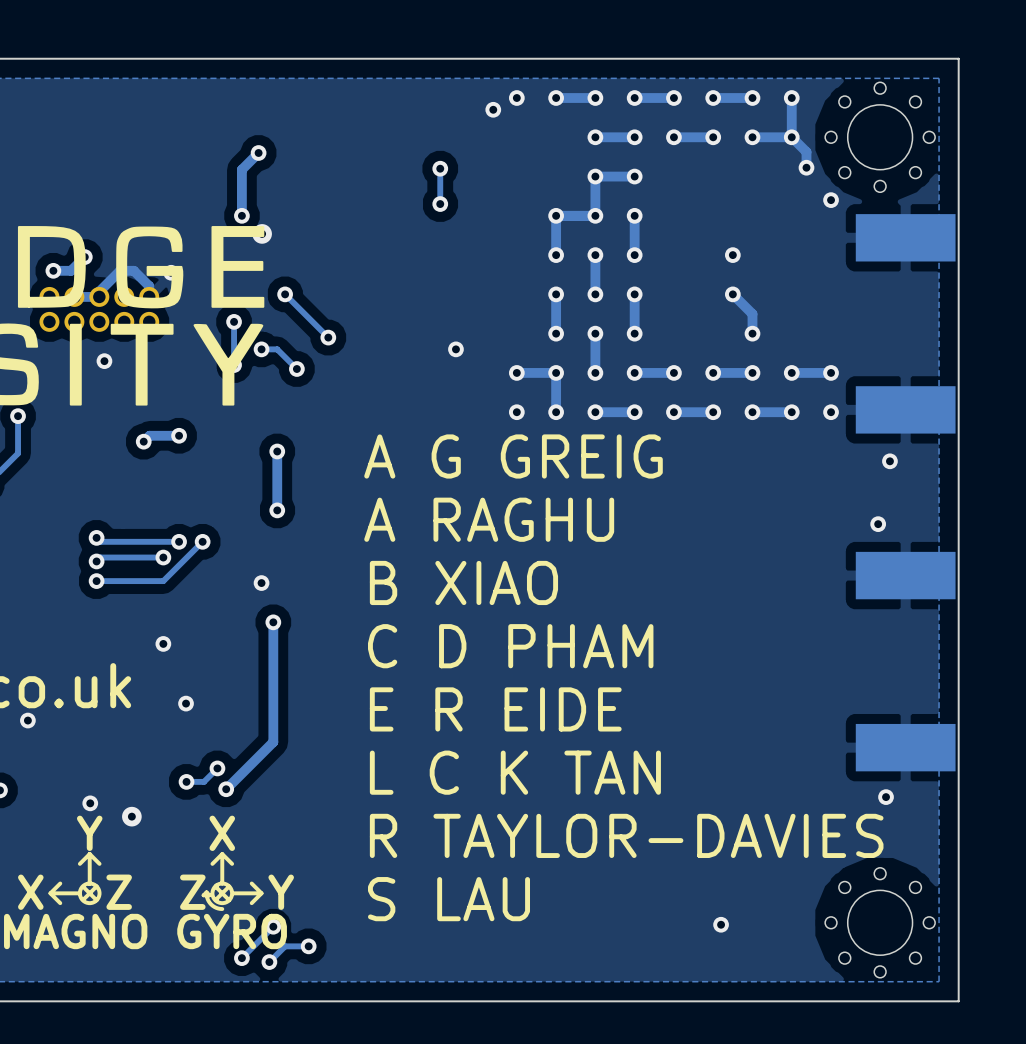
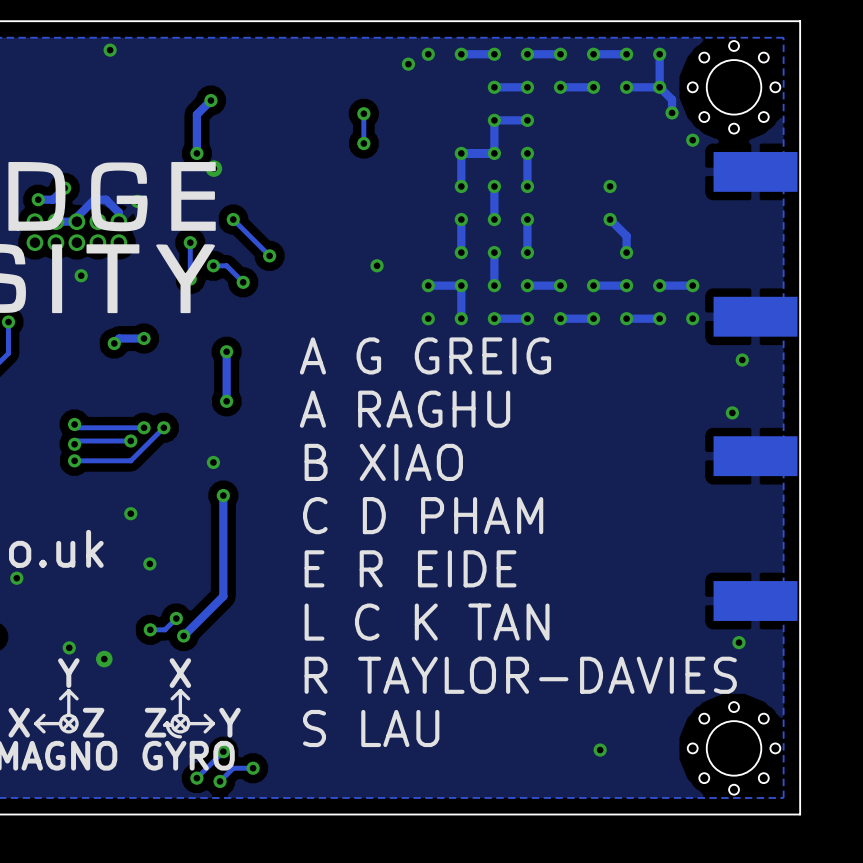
via: none -> (110, 50)

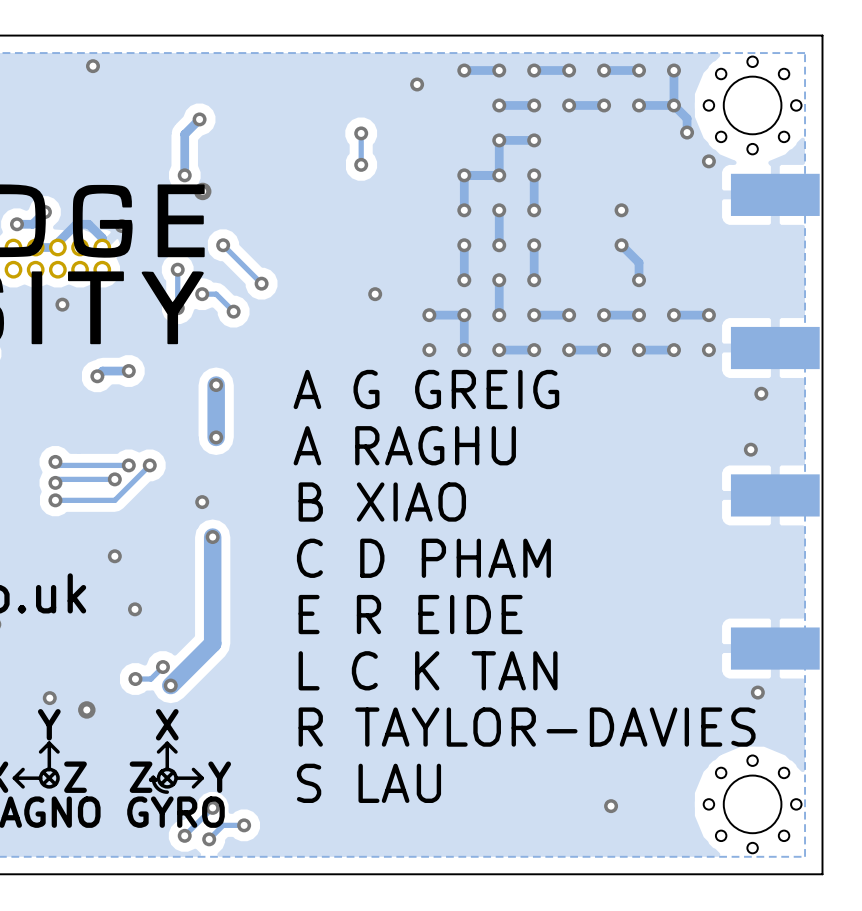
via: (428, 54) -> none
via: (408, 64) -> none
via: none -> (417, 84)
track width: thin (226, 351) (226, 401) -> thick (216, 385) (216, 437)
track width: thin (223, 495) (223, 596) (183, 636) -> thick (212, 537) (212, 643) (170, 685)

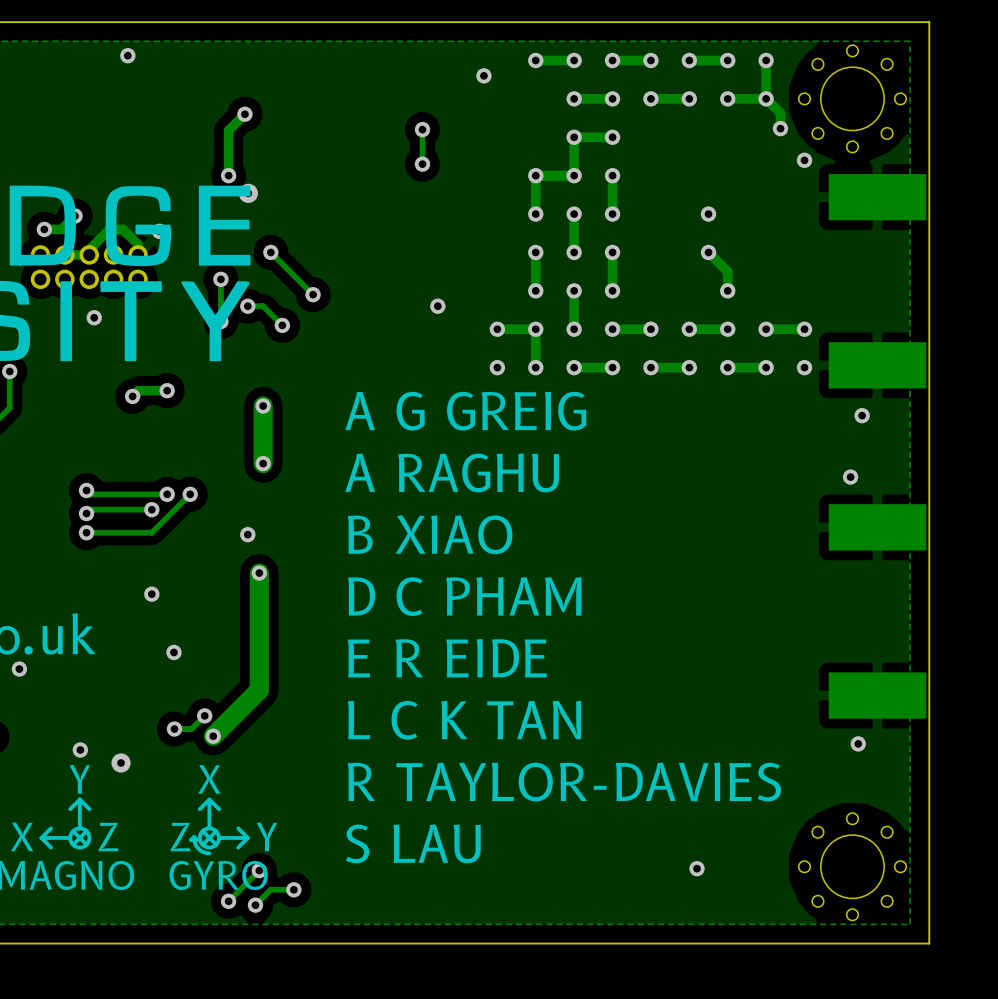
text: C D PHAM (423, 558) -> D C PHAM (464, 596)

